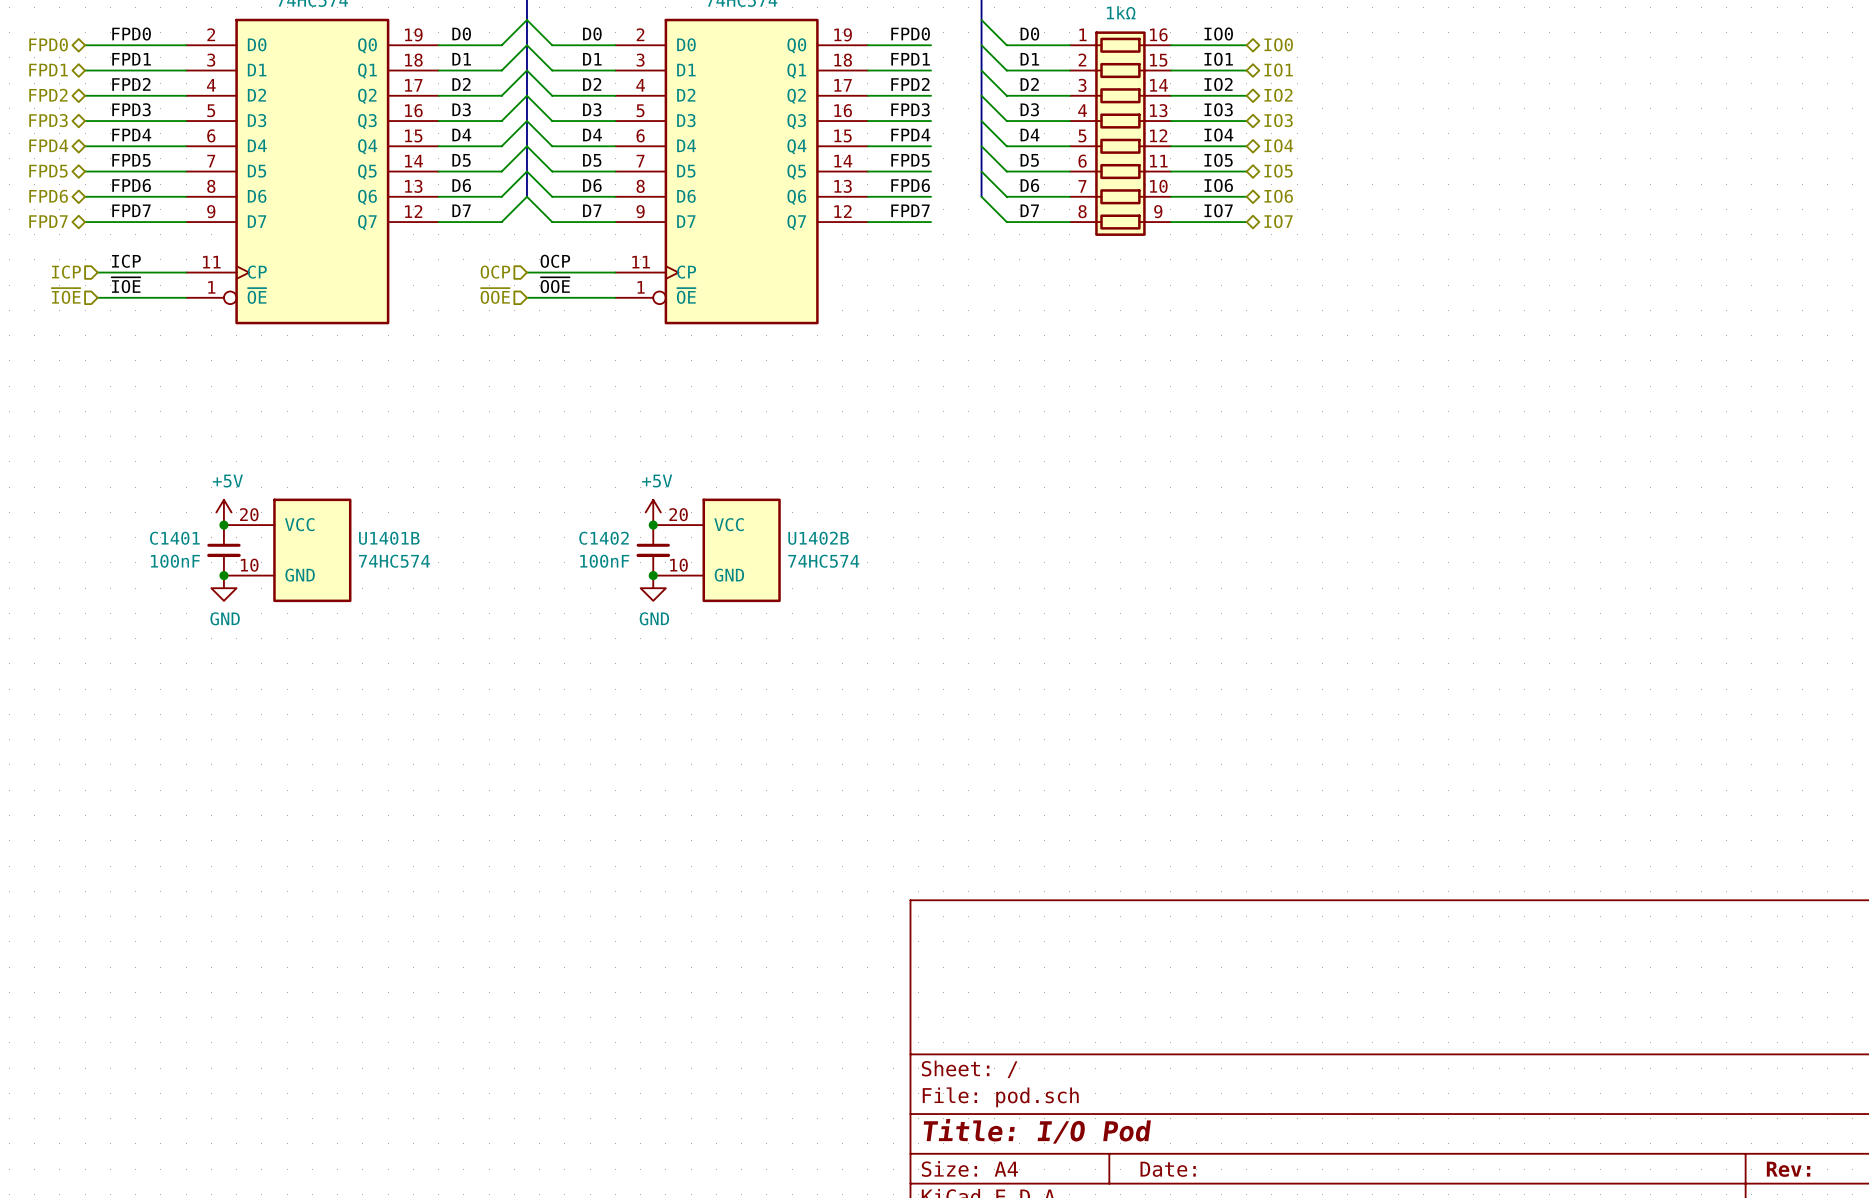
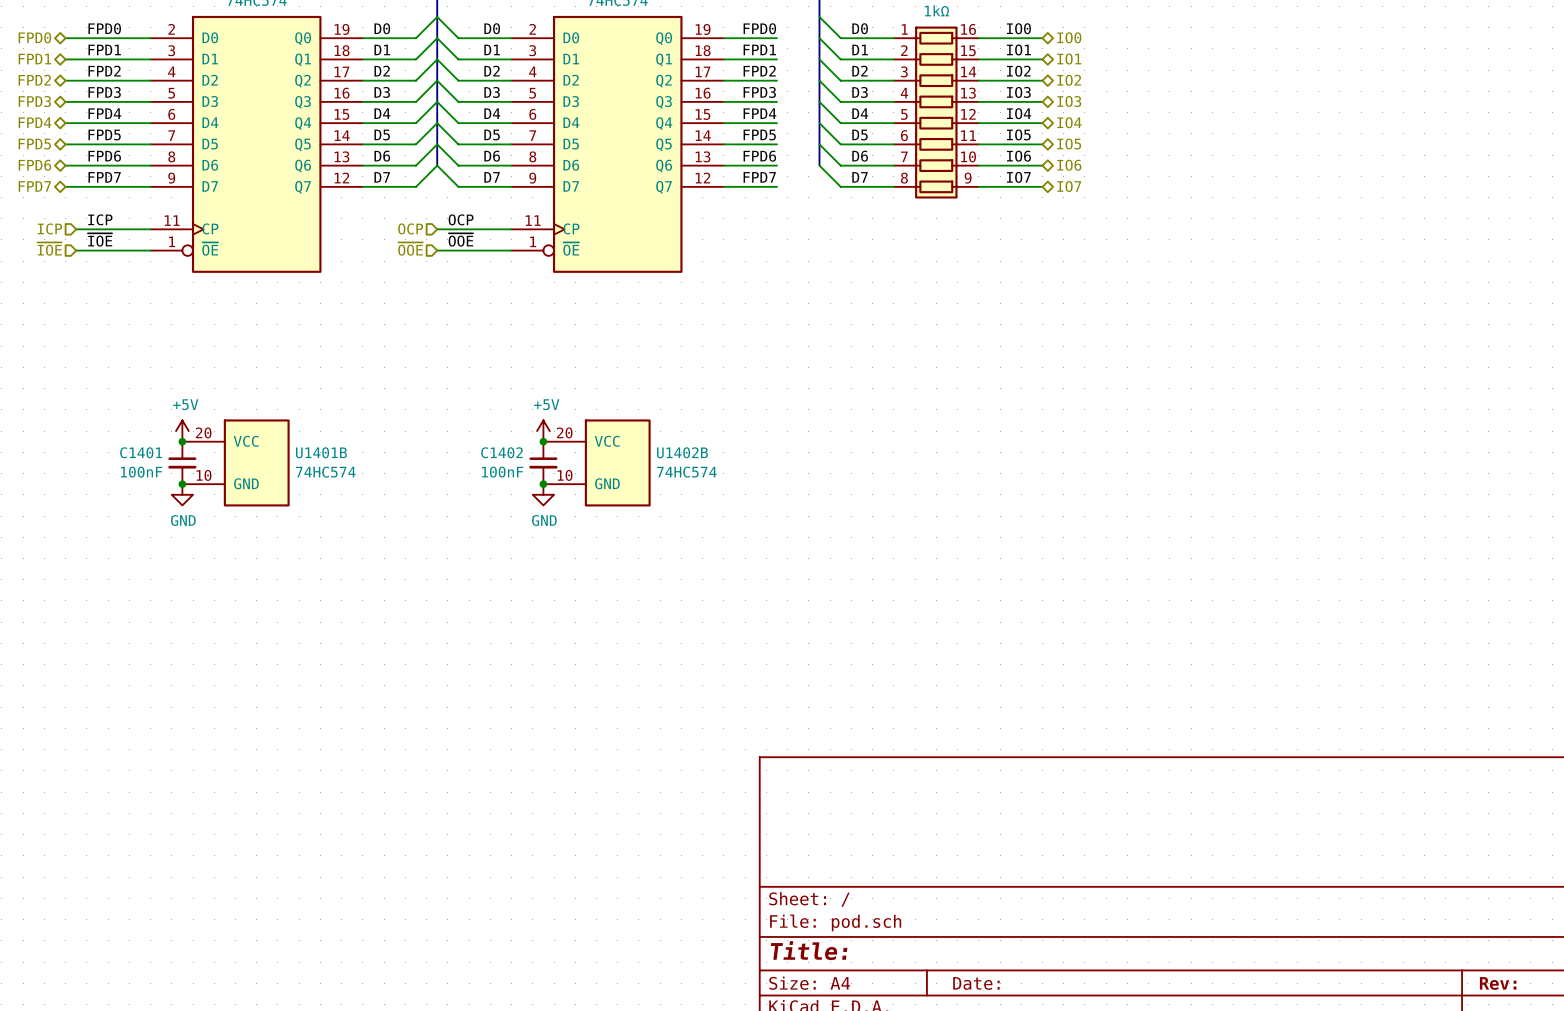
title block: Title: I/O Pod (1037, 1131) -> Title: (809, 950)

